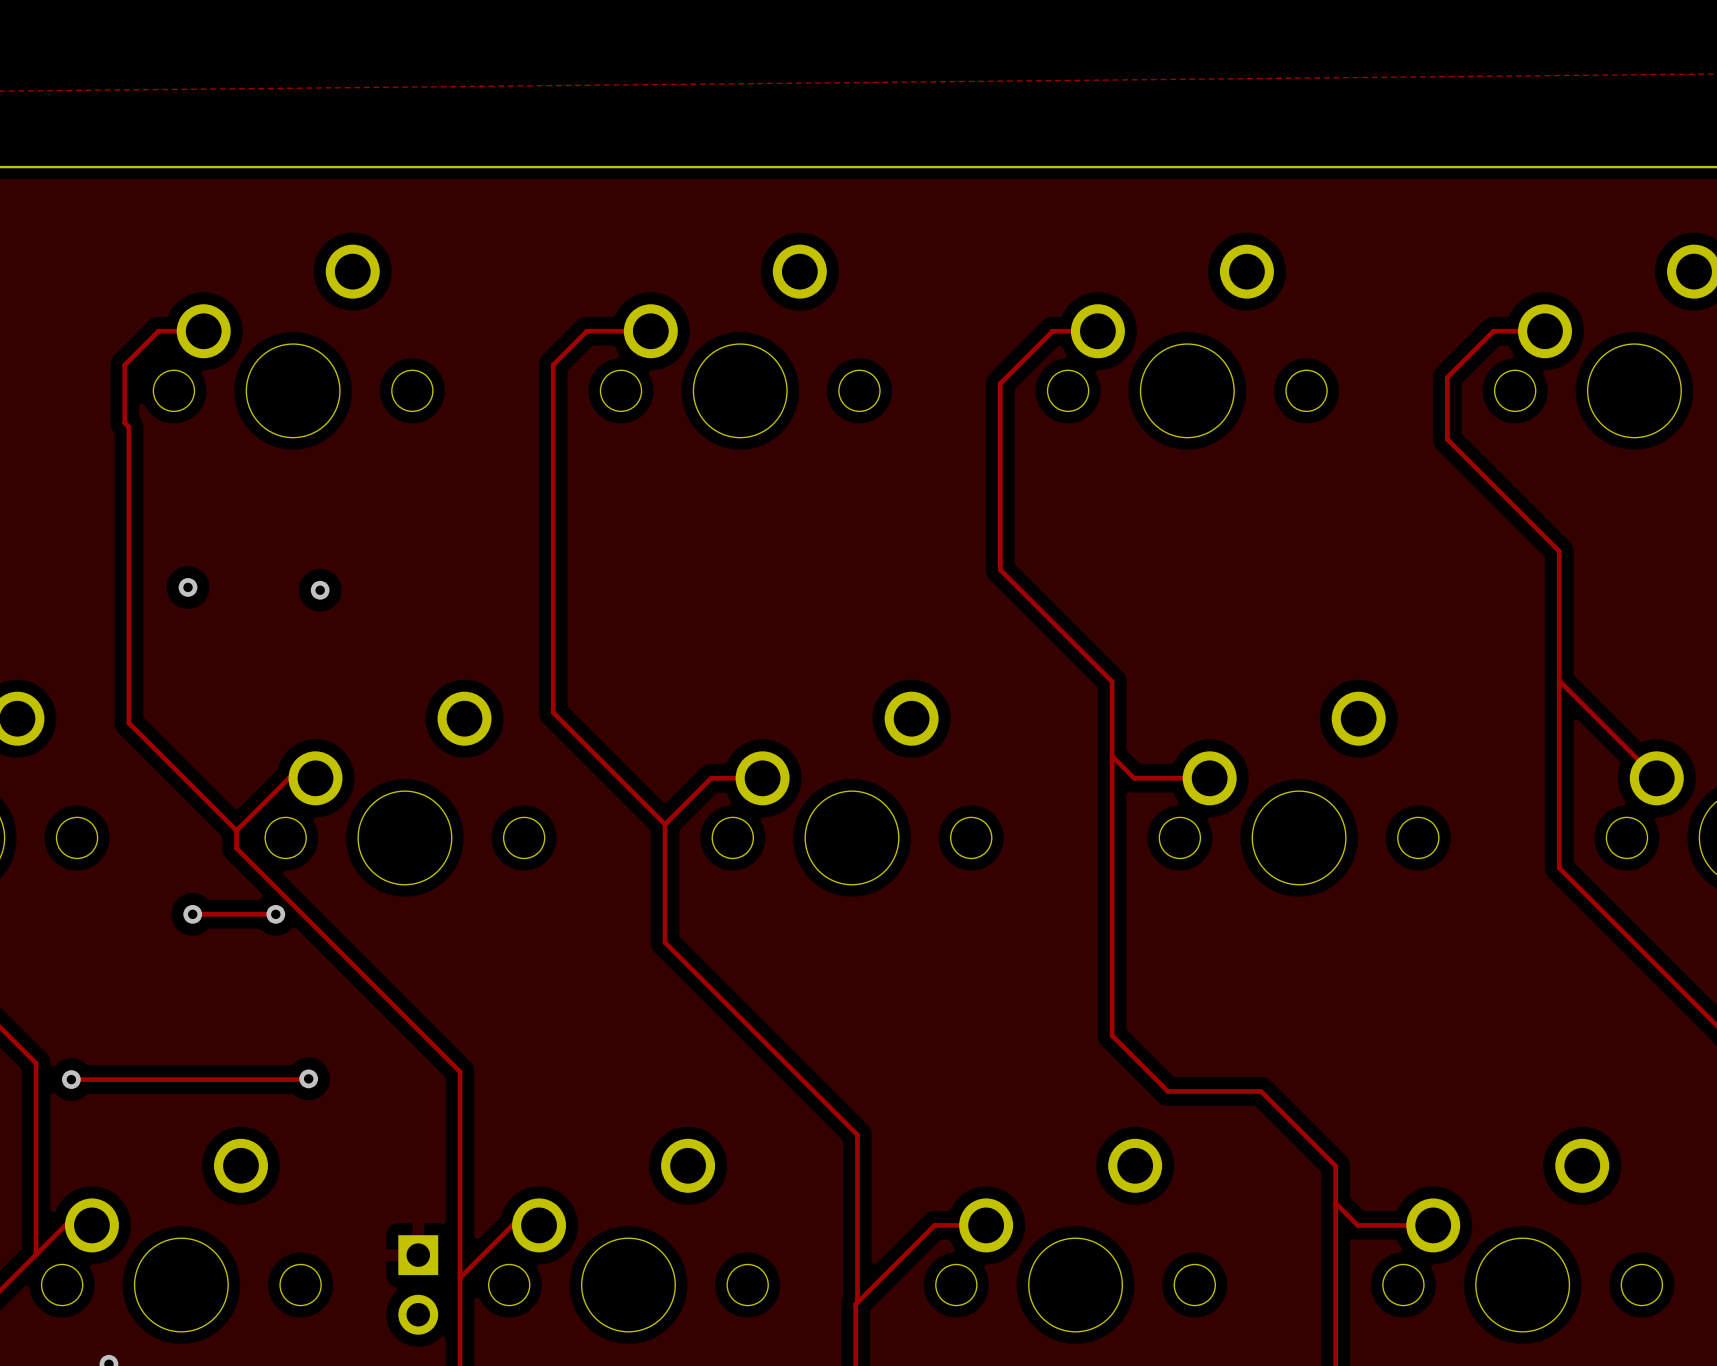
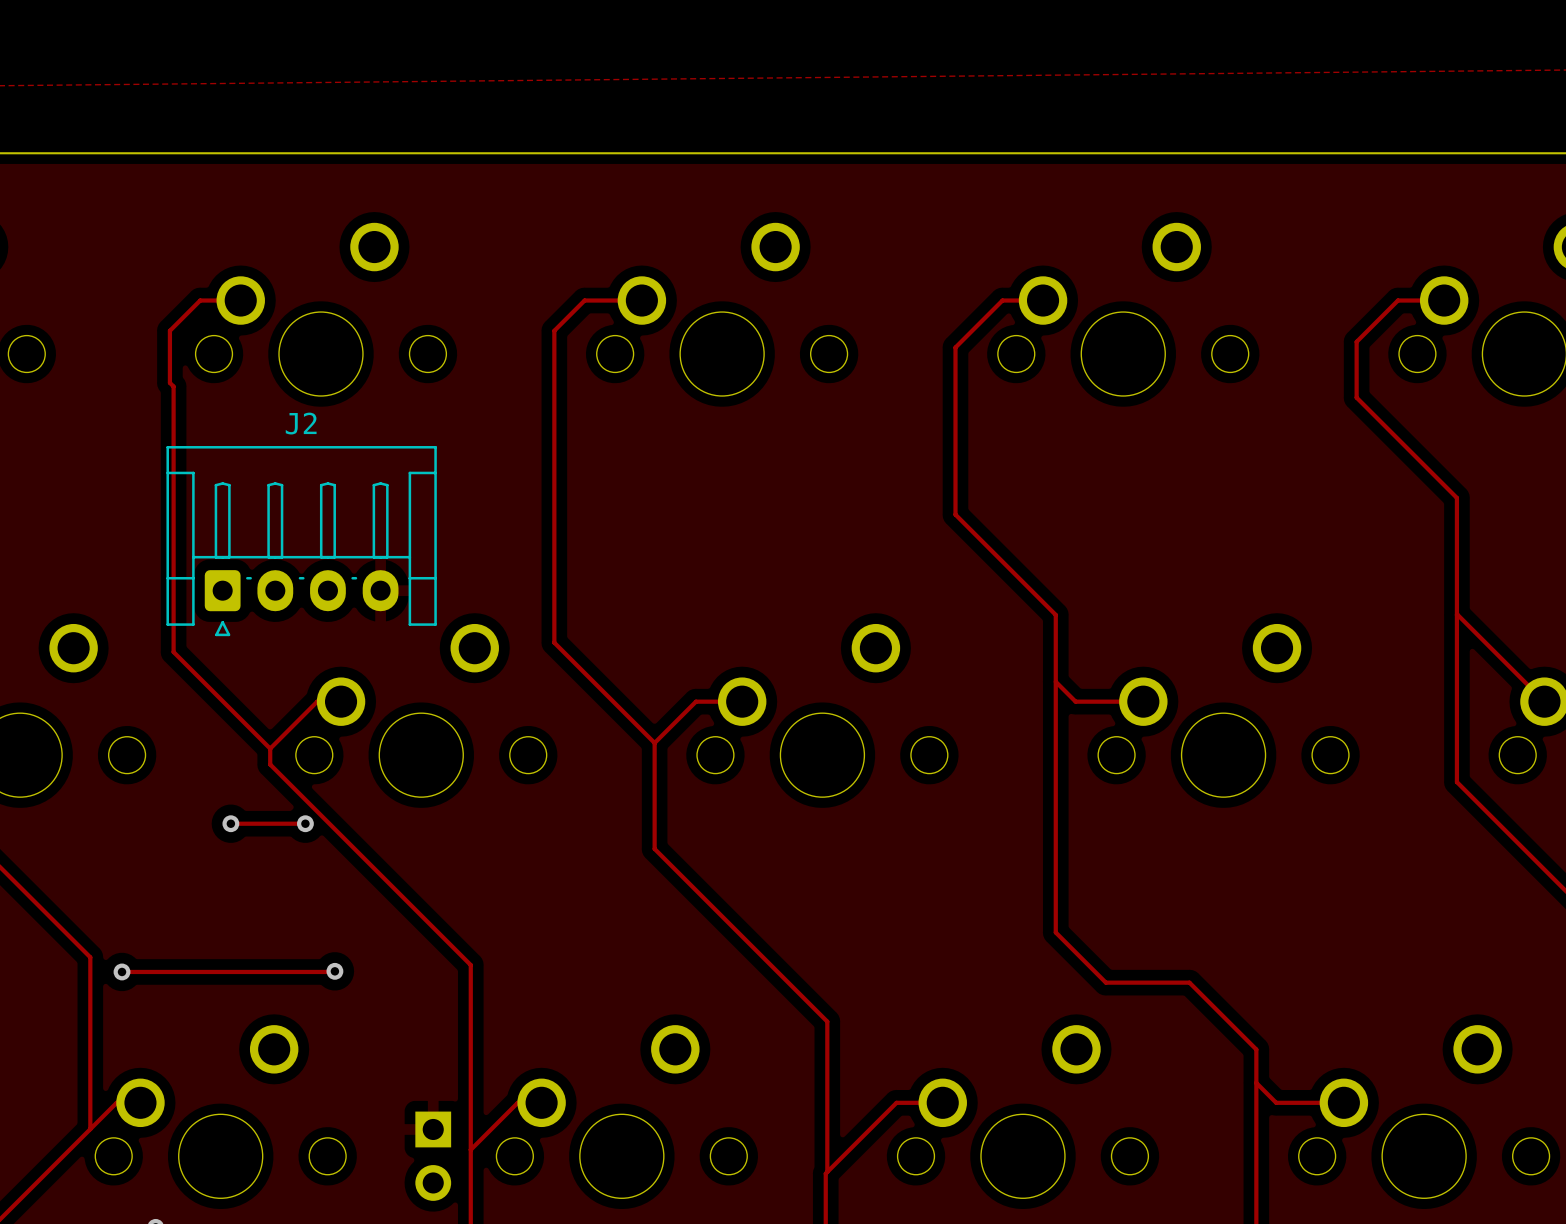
via: (188, 587) -> none
via: (320, 590) -> none
J2: none -> (301, 541)

